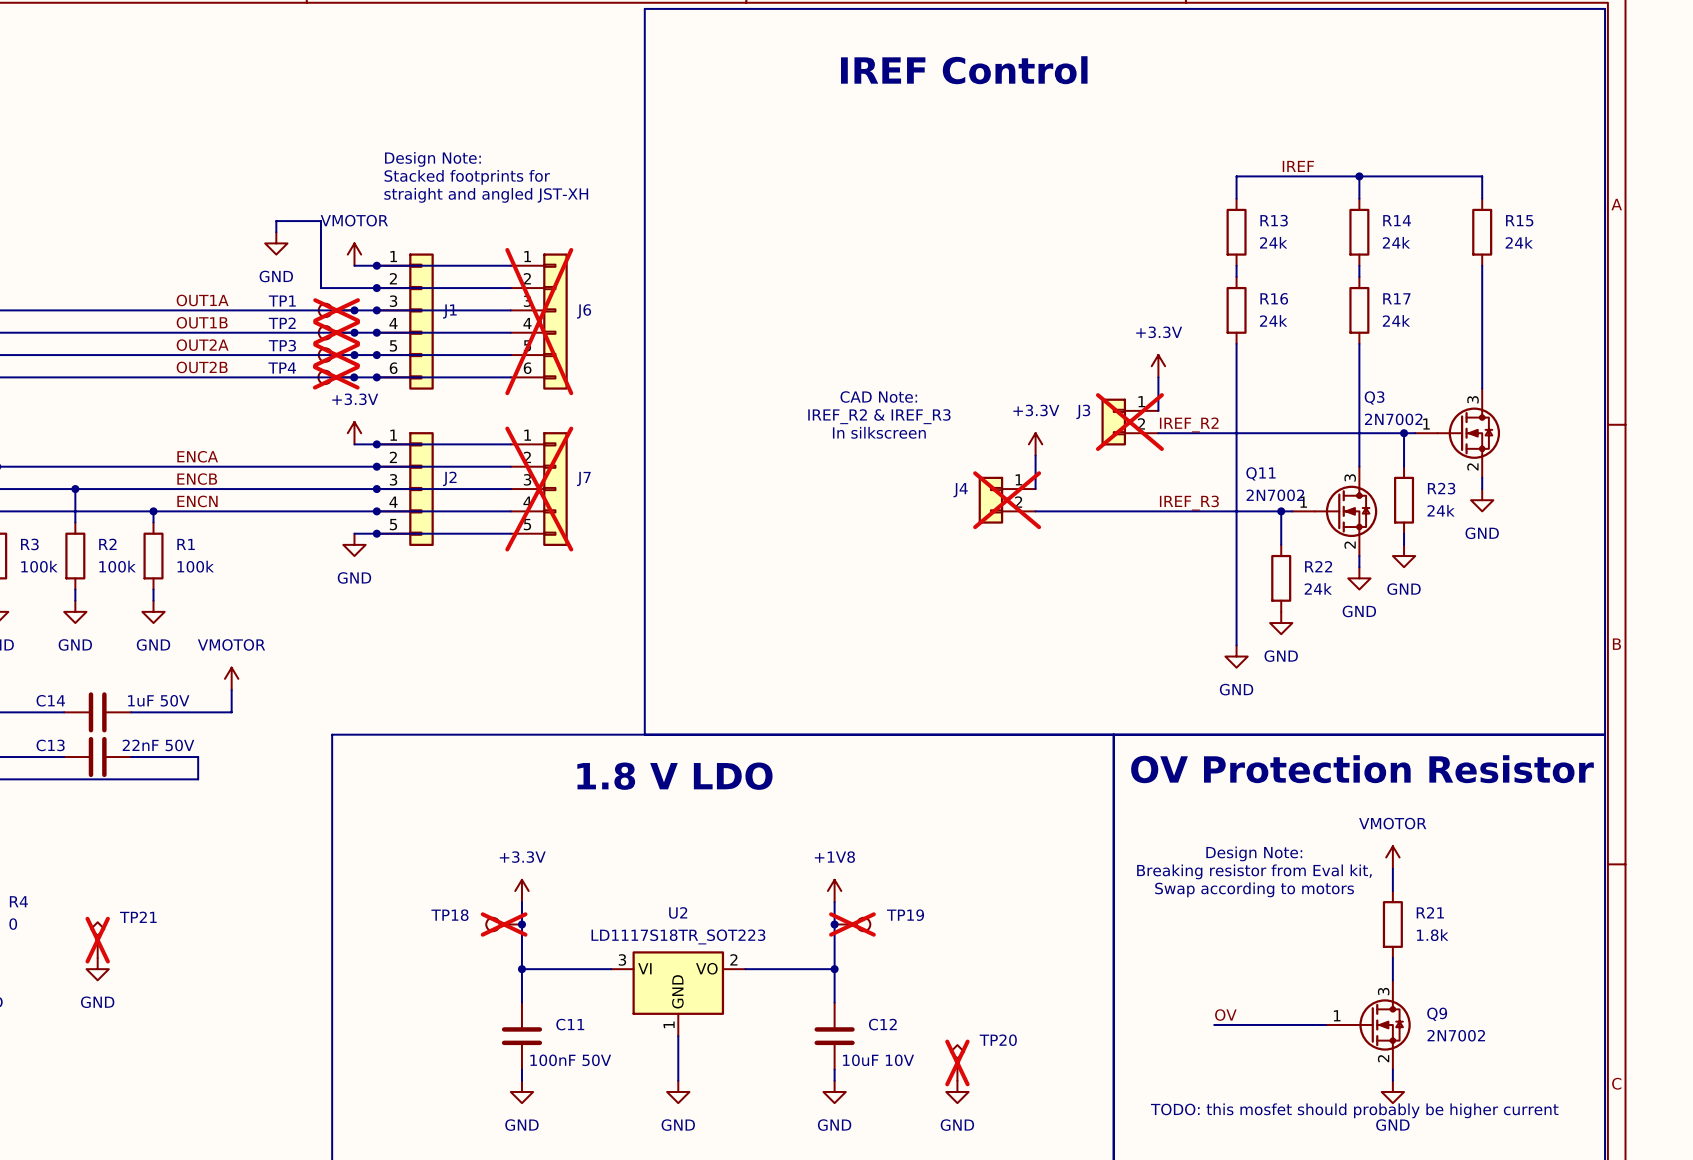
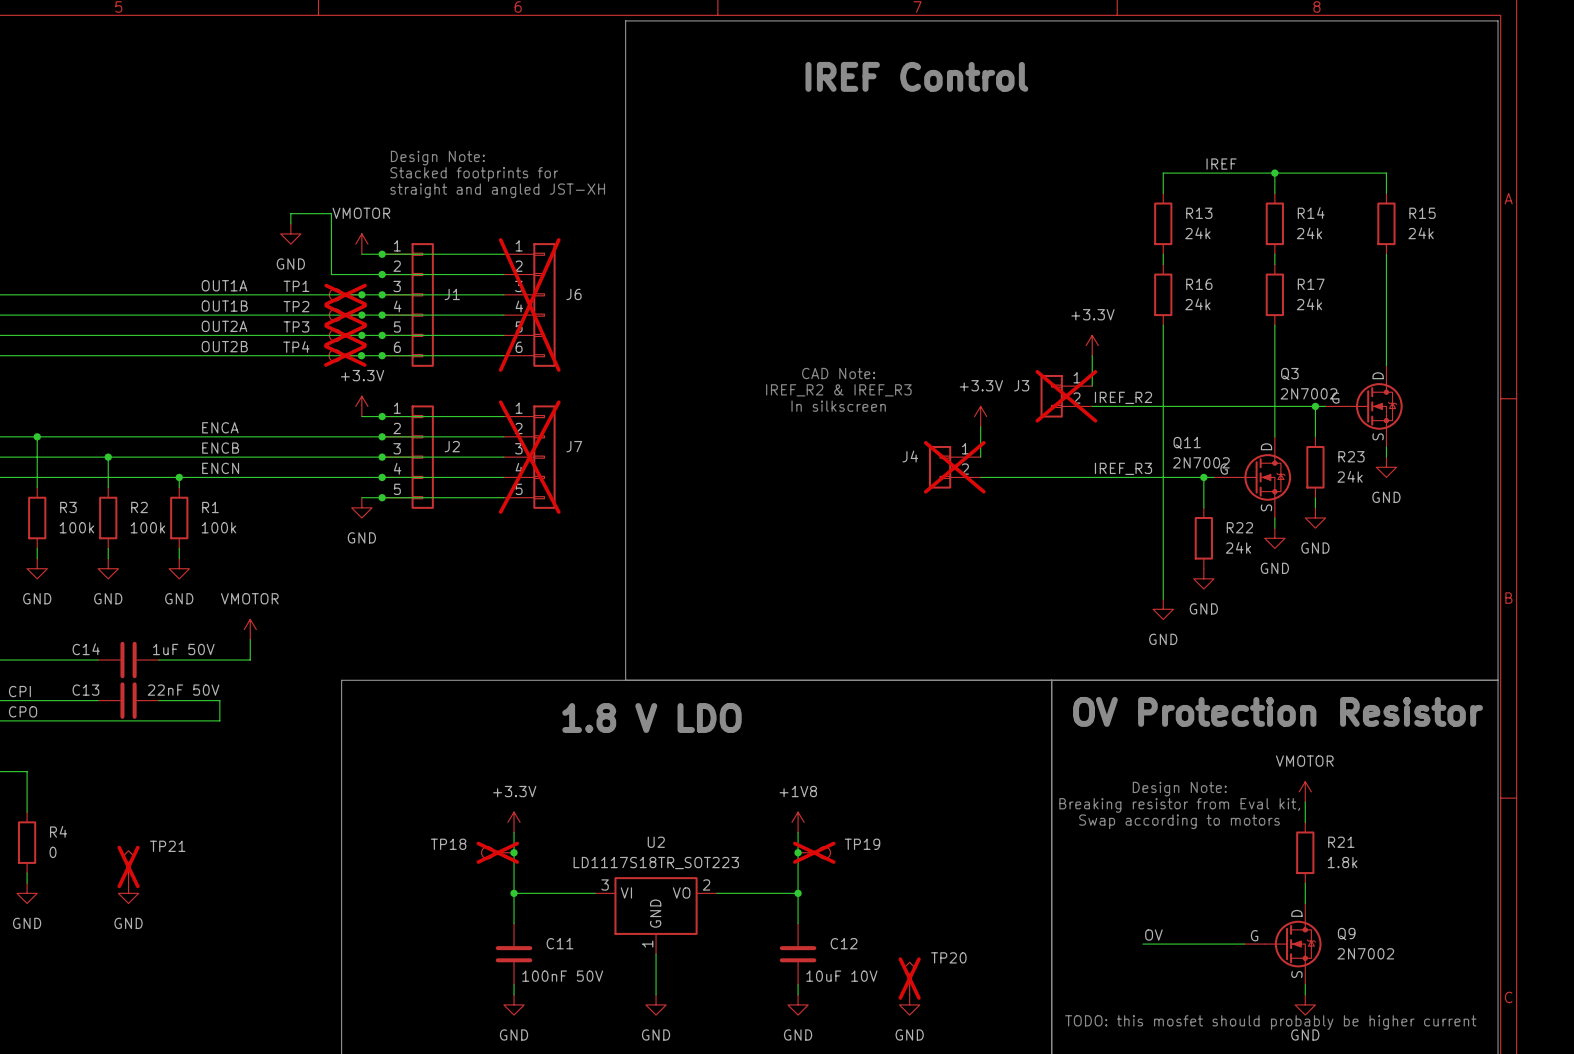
Q3 symbol: [1415, 388, 1501, 478] -> [1325, 365, 1403, 447]
Q11 symbol: [1292, 466, 1378, 557] -> [1213, 436, 1292, 519]
Q9 symbol: [1325, 980, 1411, 1070] -> [1244, 903, 1322, 985]

